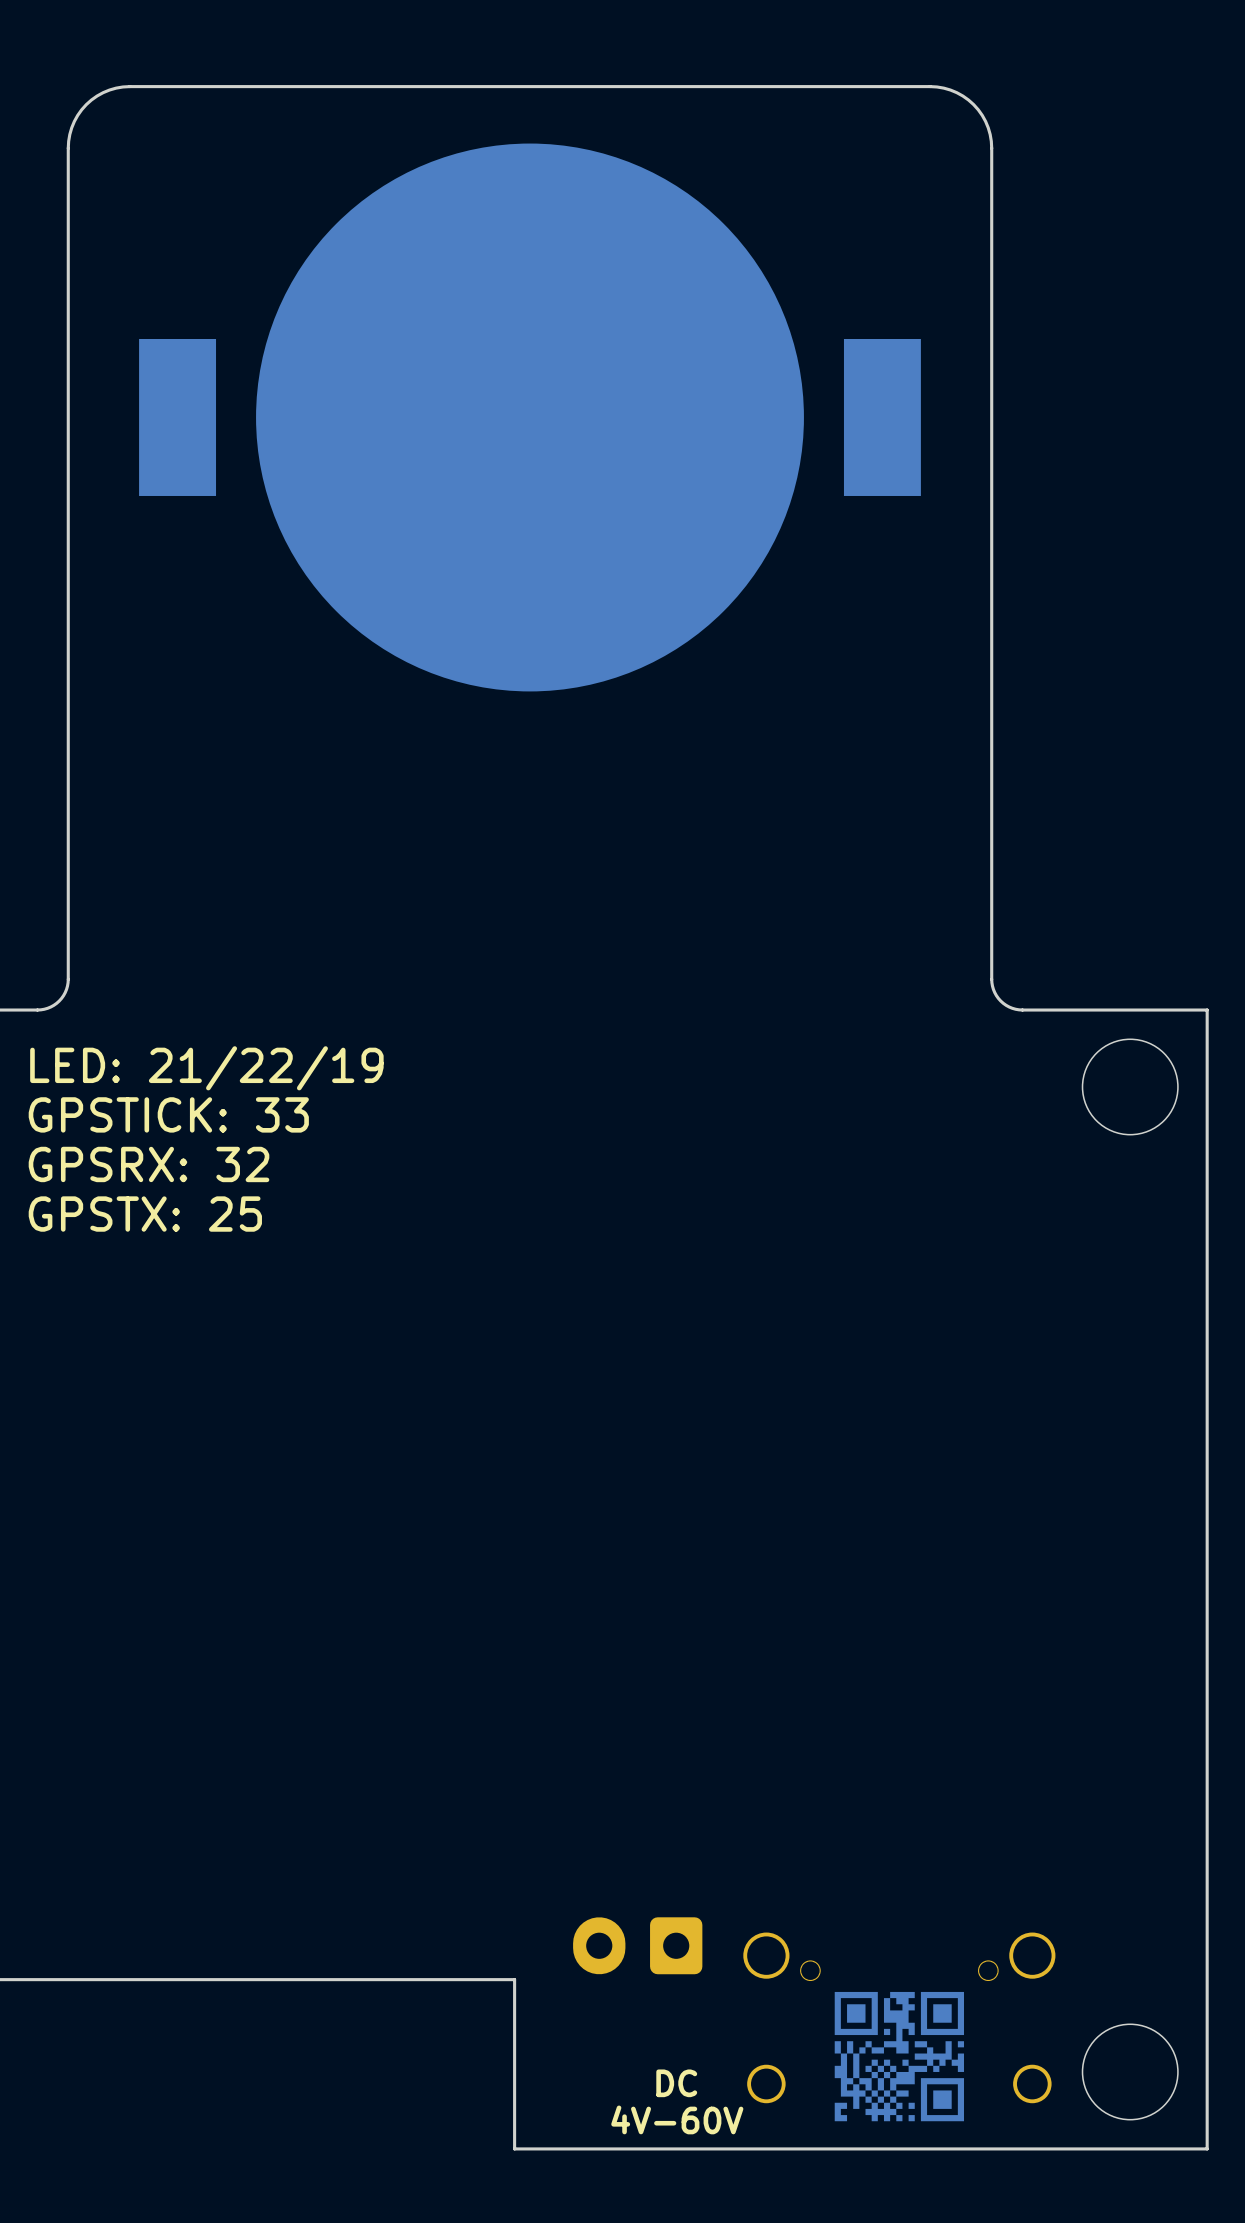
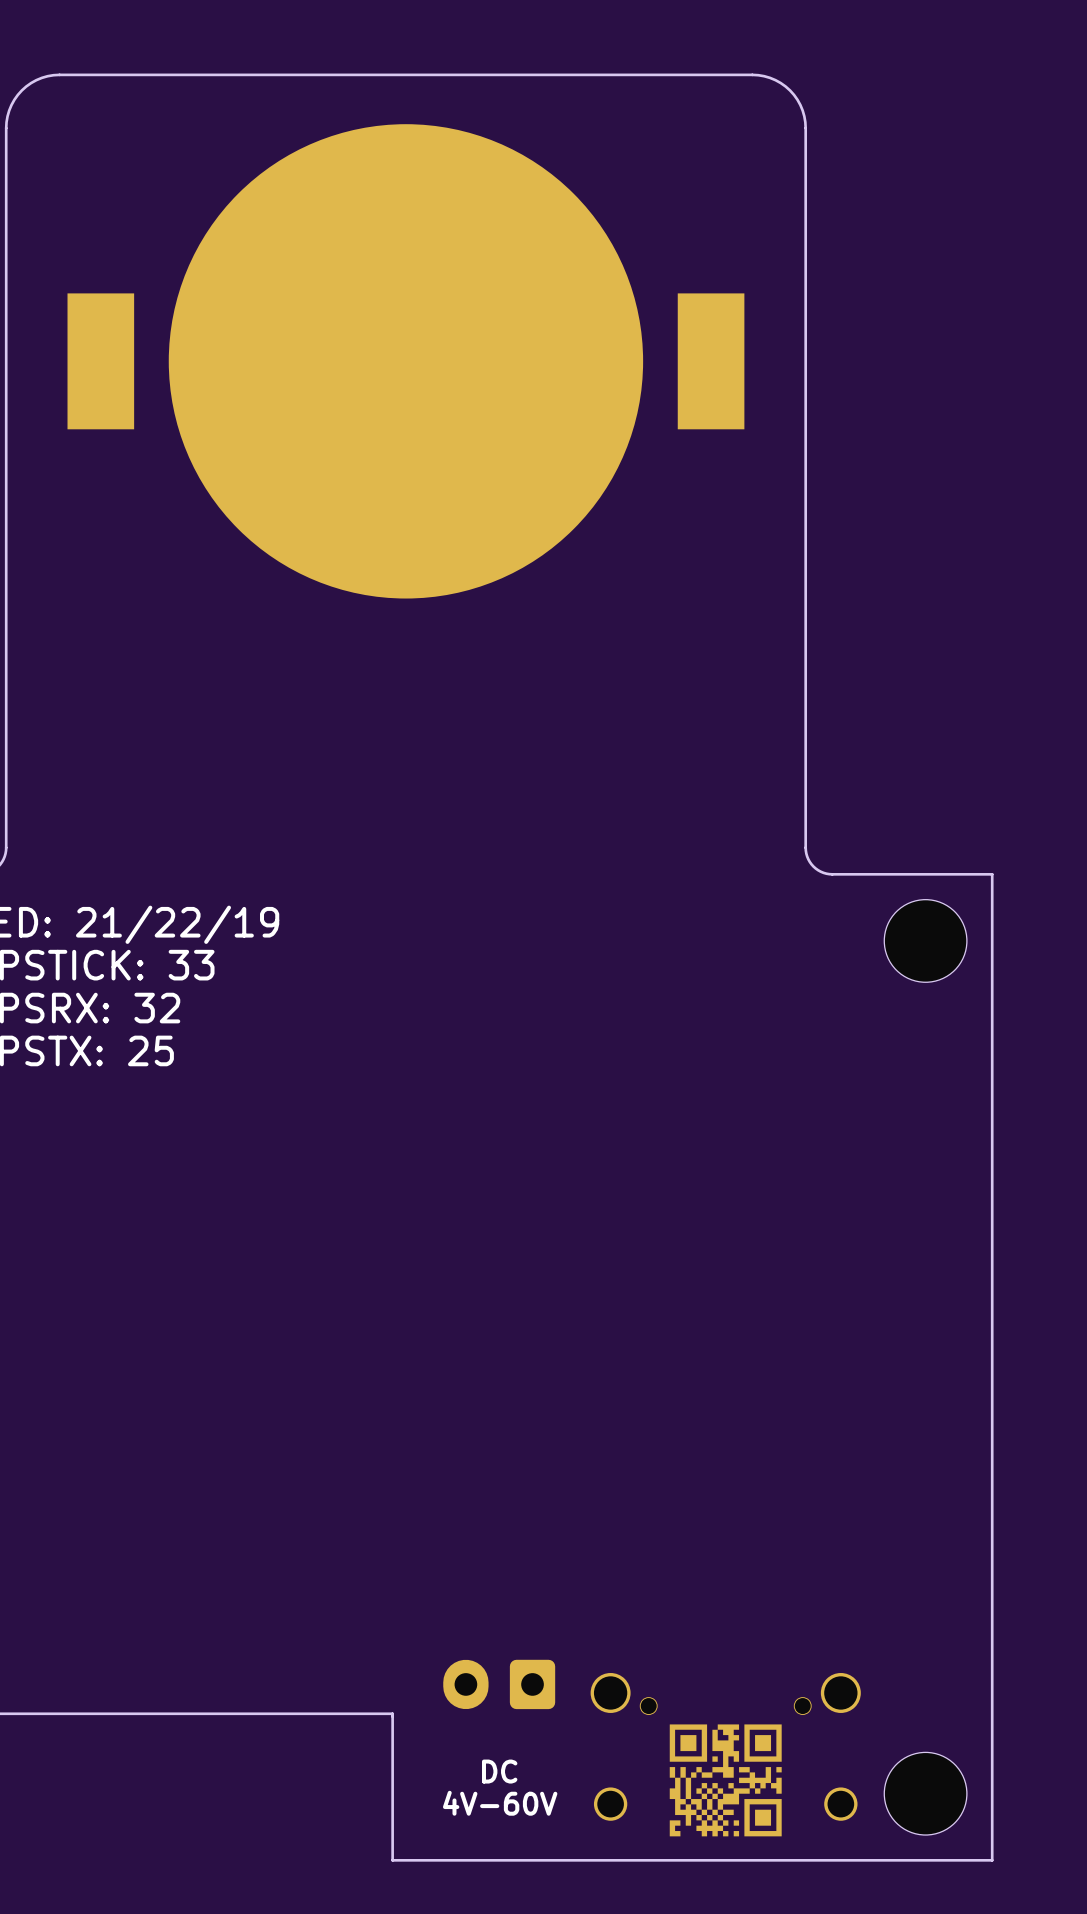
text position: DC (676, 2083) -> DC (499, 1771)
text position: 4V-60V (677, 2119) -> 4V-60V (500, 1803)

